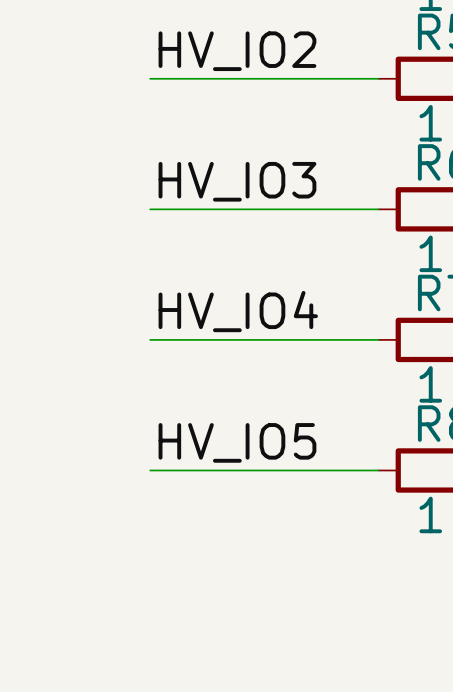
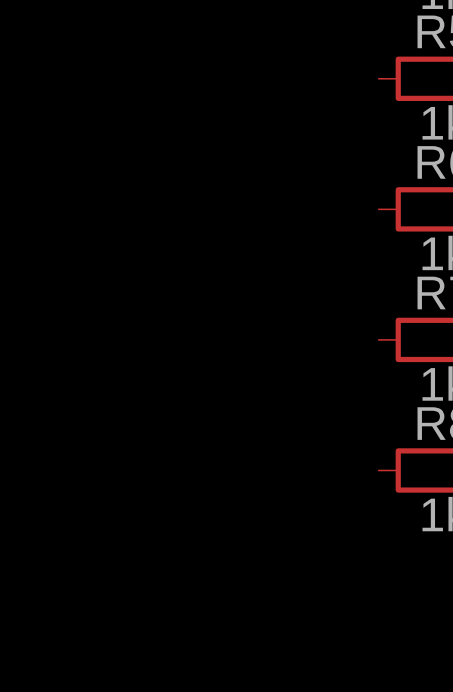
label: HV_IO2 (237, 51) -> none
wire: (150, 78) (378, 78) -> none
label: HV_IO3 (237, 181) -> none
wire: (150, 209) (378, 209) -> none
label: HV_IO4 (238, 311) -> none
wire: (150, 339) (378, 339) -> none
label: HV_IO5 (237, 442) -> none
wire: (150, 470) (378, 470) -> none

